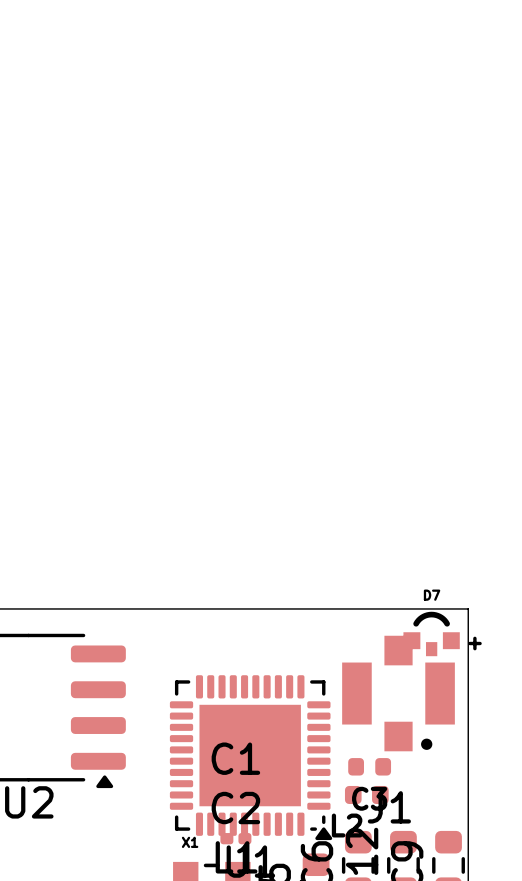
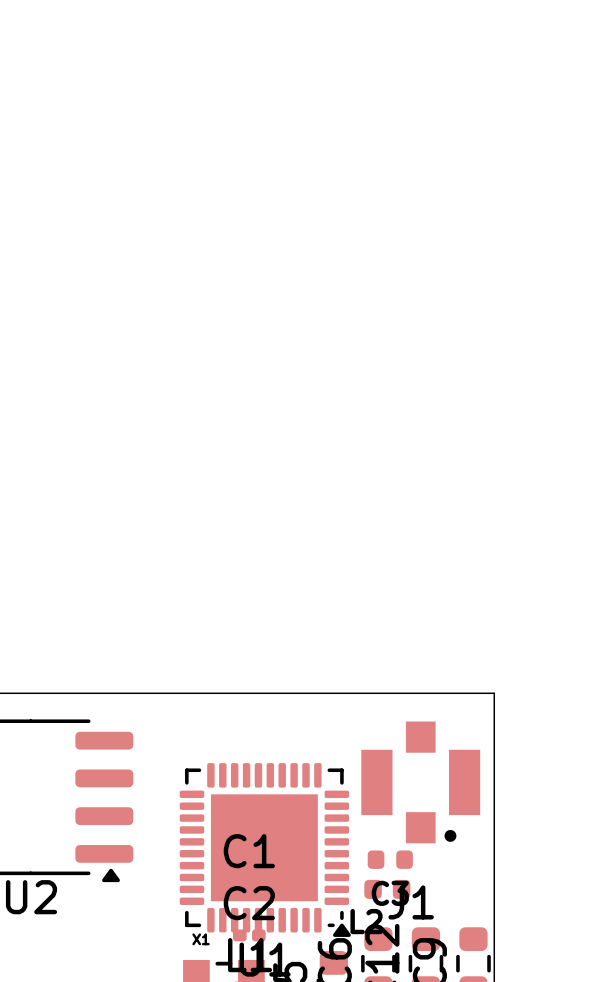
D7: (431, 633) -> none

